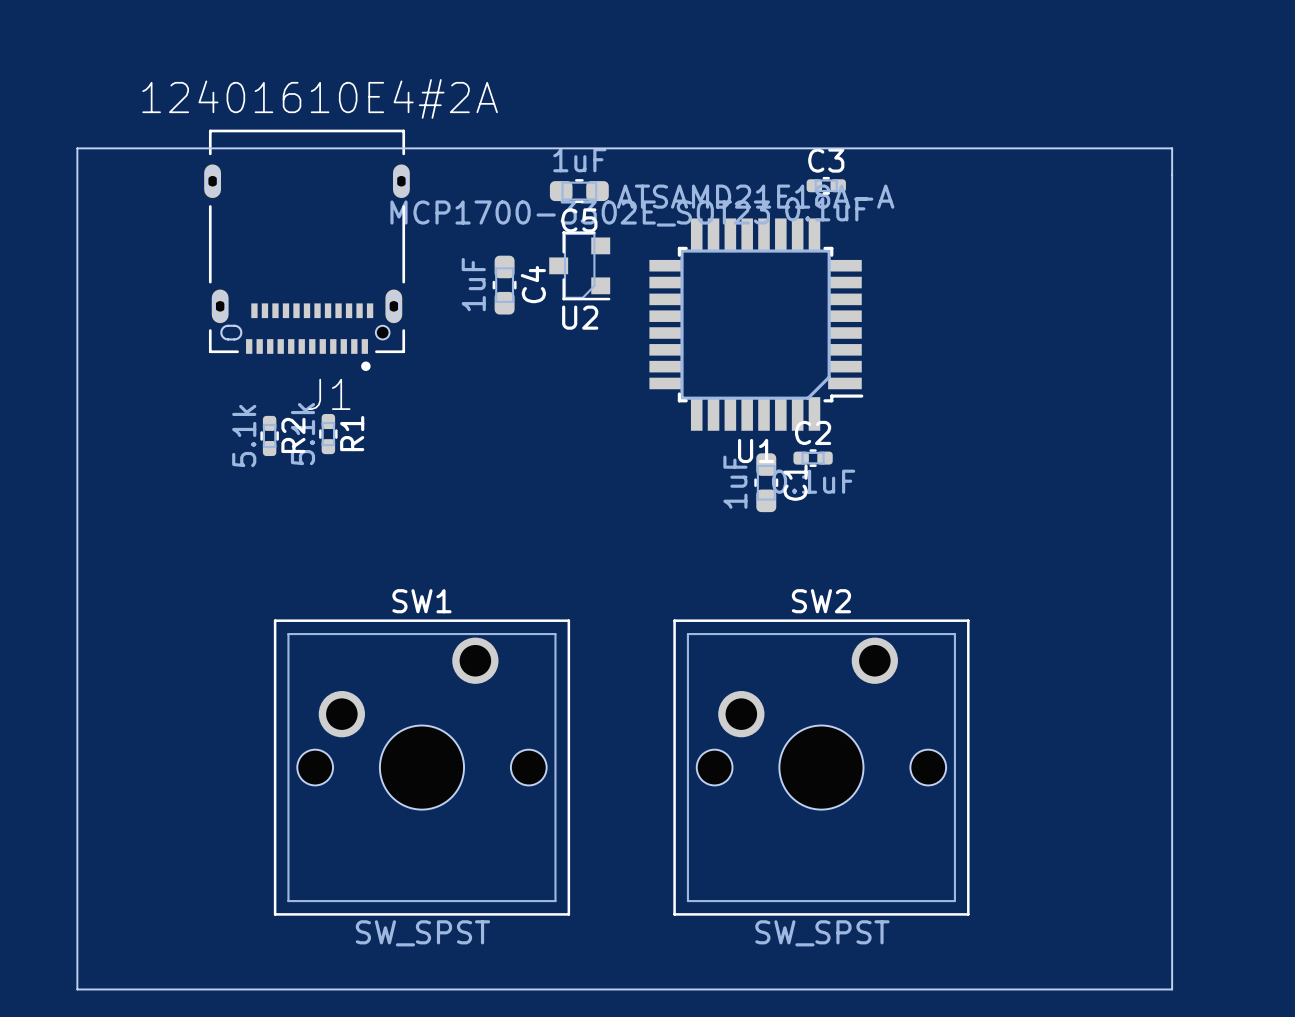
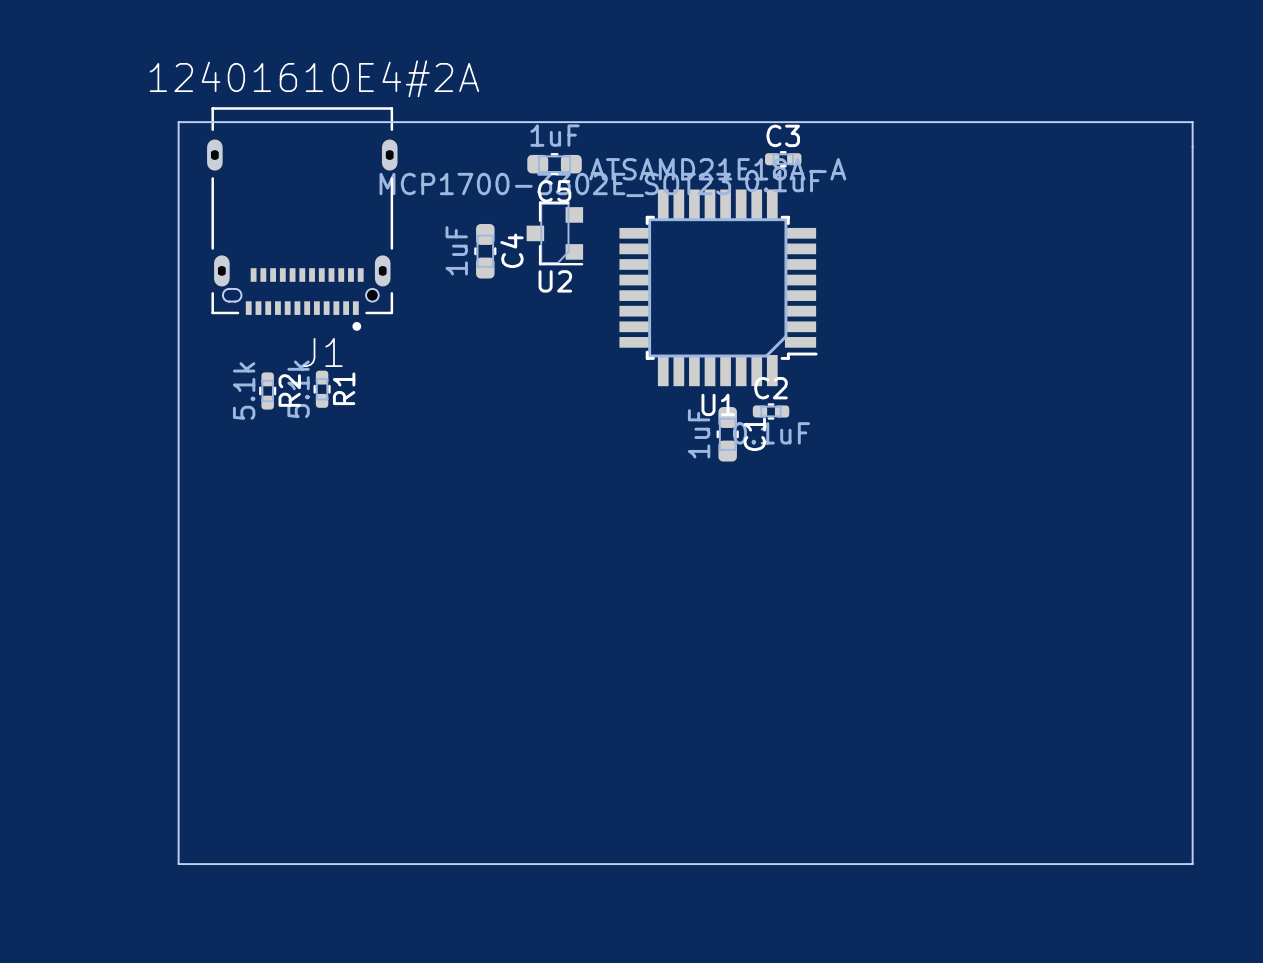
board edge: (77, 148) (1172, 148) (1172, 989) (77, 989) (77, 148) -> (178, 122) (178, 864) (1192, 864) (1192, 122) (178, 122)
SW1: SW_SPST (421, 767) -> none
SW2: SW_SPST (821, 767) -> none

